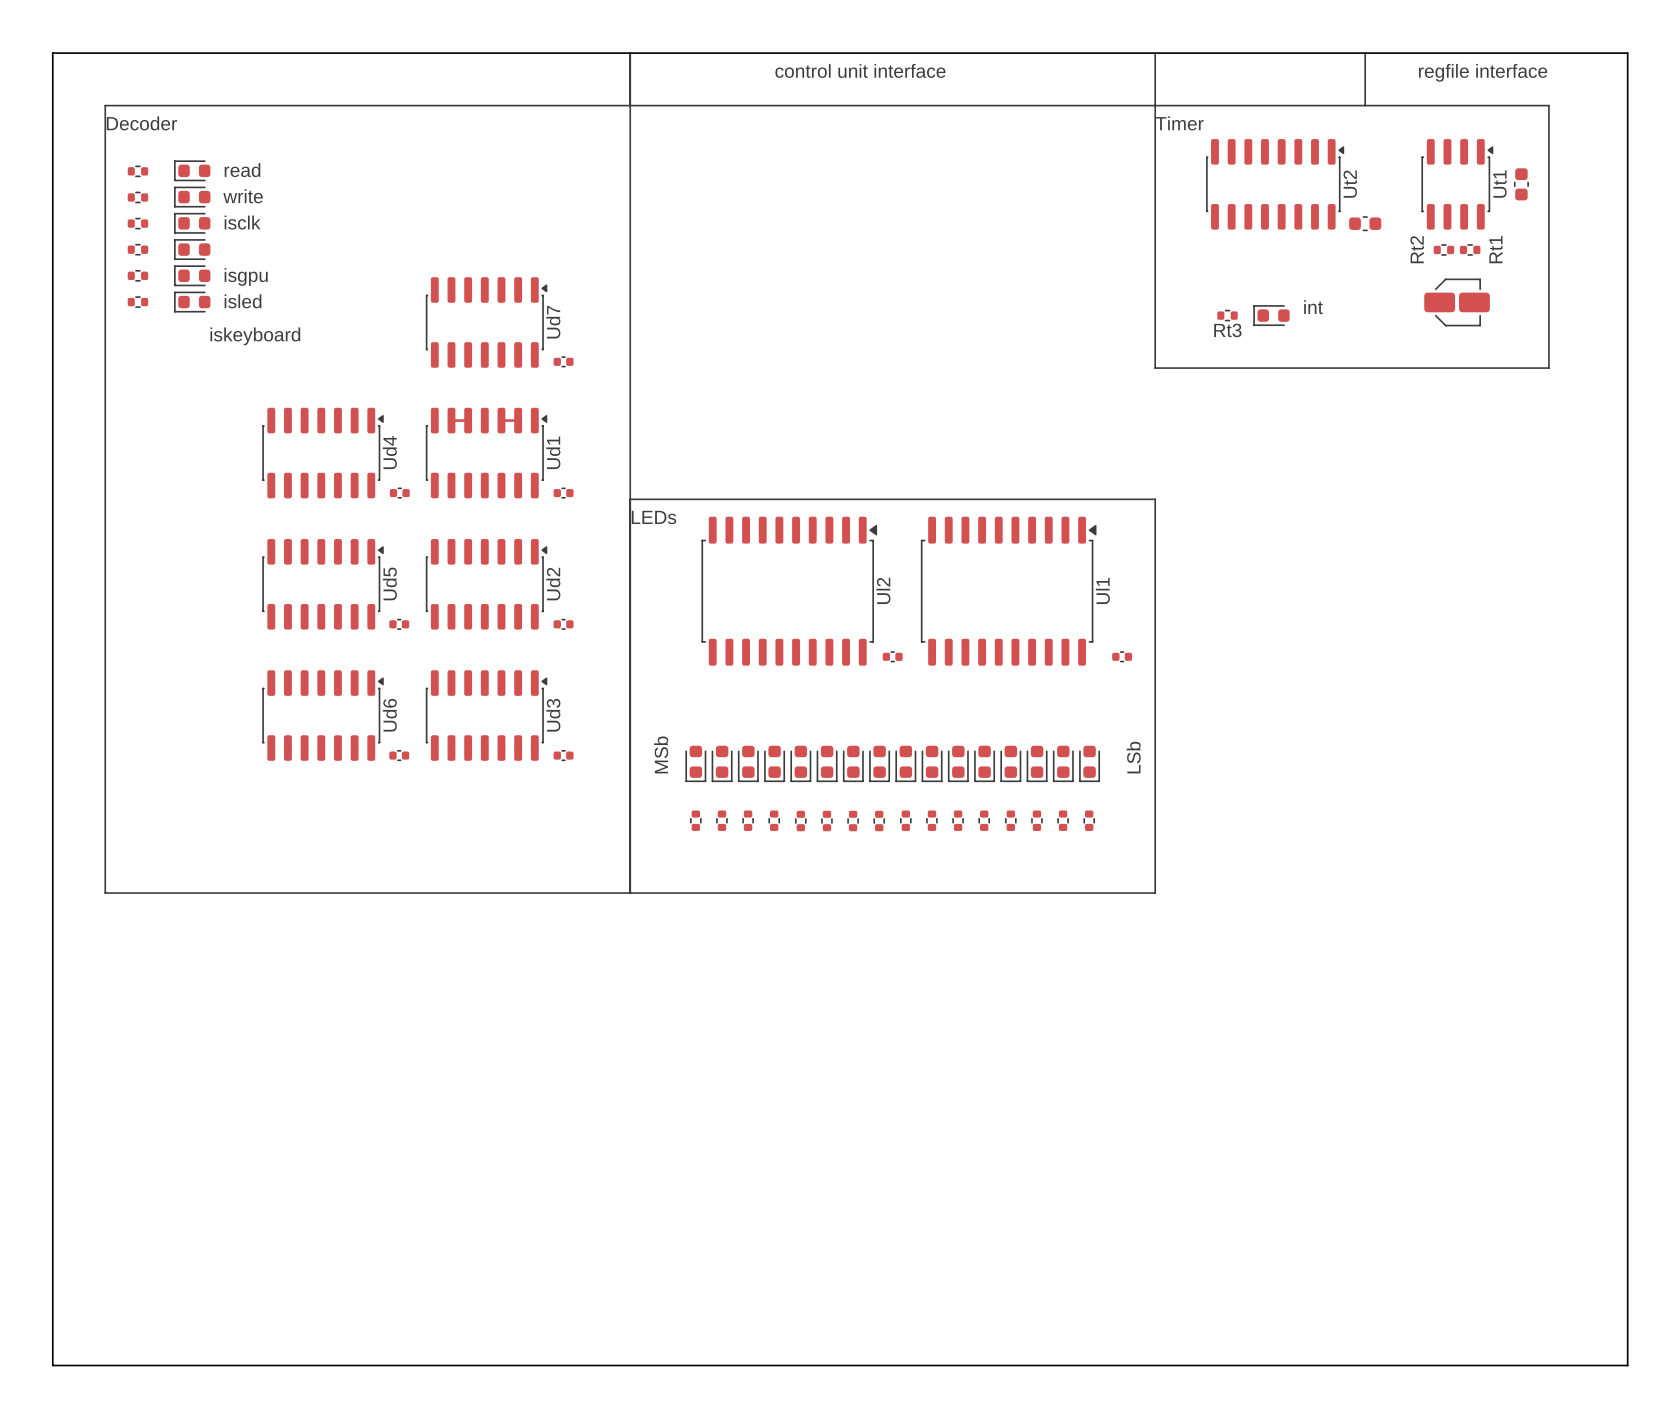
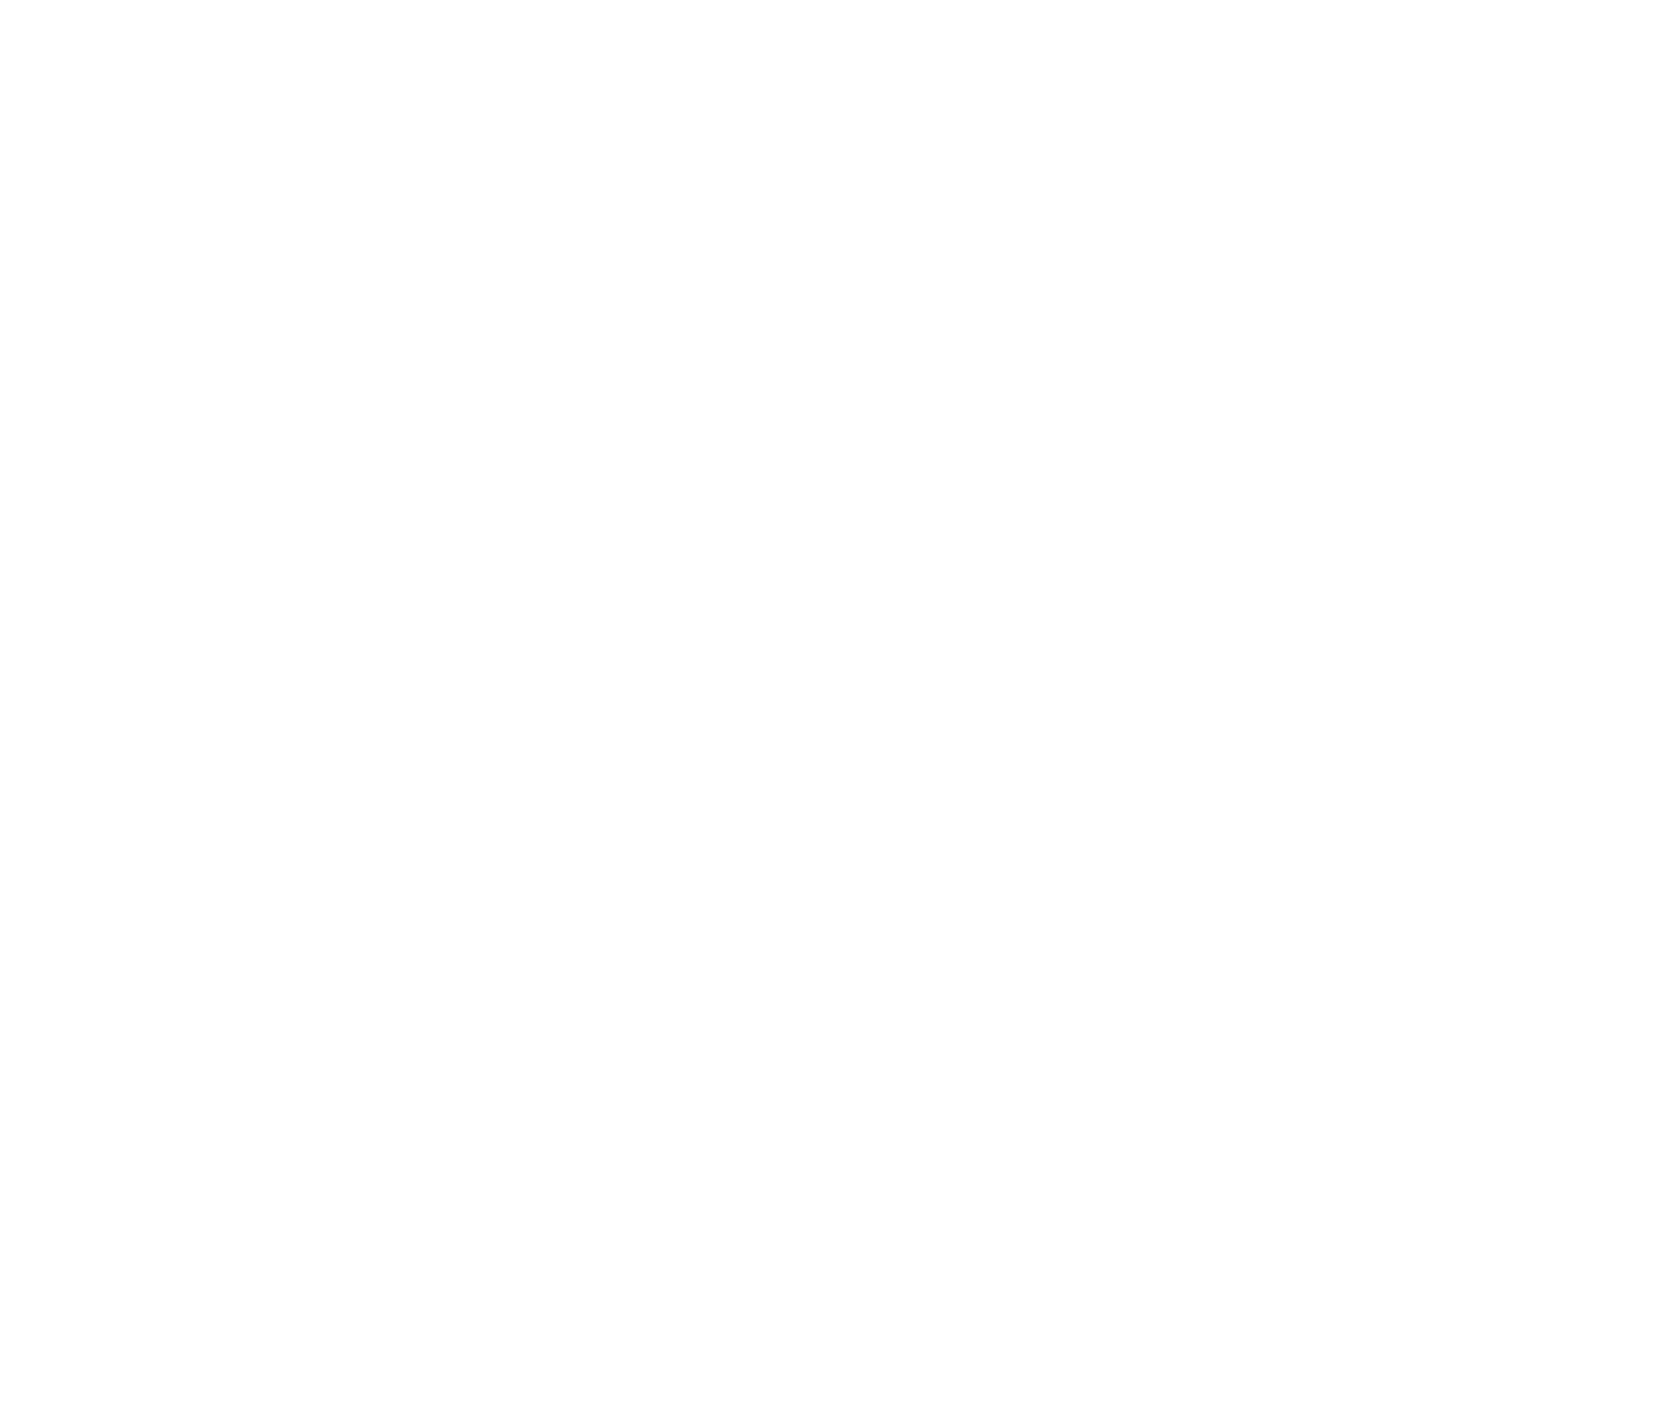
board edge: (52, 53) (1627, 53) (1627, 1365) (52, 1365) (52, 53) -> none
line: (630, 53) (630, 893) -> none
line: (1155, 53) (1155, 368) (1548, 368) (1548, 105) (105, 105) (105, 893) (1155, 893) (1155, 499) (630, 499) -> none
line: (1365, 53) (1365, 105) -> none
text: control unit interface (860, 70) -> none
text: regfile interface (1483, 72) -> none
text: Decoder (141, 123) -> none
text: Timer (1179, 123) -> none
part: (192, 170) -> none
text: read (242, 170) -> none
part: (137, 171) -> none
Ut2: (1275, 184) -> none
Ut1: (1457, 184) -> none
part: (1521, 184) -> none
text: write (243, 196) -> none
part: (137, 197) -> none
part: (192, 197) -> none
text: isclk (242, 222) -> none
part: (137, 223) -> none
part: (192, 223) -> none
part: (1365, 223) -> none
part: (137, 249) -> none
part: (192, 249) -> none
Rt2: (1443, 249) -> none
Rt1: (1470, 249) -> none
part: (137, 275) -> none
part: (192, 275) -> none
text: isgpu (246, 276) -> none
text: isled (243, 301) -> none
part: (137, 302) -> none
part: (192, 302) -> none
part: (1457, 302) -> none
text: int (1313, 307) -> none
Rt3: (1227, 315) -> none
part: (1271, 315) -> none
Ud7: (486, 322) -> none
text: iskeyboard (255, 336) -> none
part: (563, 361) -> none
track: (451, 420) (468, 420) -> none
track: (501, 420) (518, 420) -> none
Ud4: (323, 453) -> none
Ud1: (486, 453) -> none
part: (399, 493) -> none
part: (563, 493) -> none
text: LEDs (653, 517) -> none
Ud5: (323, 584) -> none
Ud2: (486, 584) -> none
Ul2: (789, 591) -> none
Ul1: (1008, 591) -> none
part: (399, 624) -> none
part: (563, 624) -> none
part: (892, 656) -> none
part: (1122, 656) -> none
Ud6: (323, 715) -> none
Ud3: (486, 715) -> none
text: MSb (661, 754) -> none
part: (399, 755) -> none
part: (563, 755) -> none
text: LSb (1133, 757) -> none
part: (695, 763) -> none
part: (722, 763) -> none
part: (748, 763) -> none
part: (774, 763) -> none
part: (800, 763) -> none
part: (827, 763) -> none
part: (853, 763) -> none
part: (879, 763) -> none
part: (905, 763) -> none
part: (932, 763) -> none
part: (958, 763) -> none
part: (984, 763) -> none
part: (1010, 763) -> none
part: (1037, 763) -> none
part: (1063, 763) -> none
part: (1089, 763) -> none
part: (695, 820) -> none
part: (721, 820) -> none
part: (748, 820) -> none
part: (774, 820) -> none
part: (800, 820) -> none
part: (826, 820) -> none
part: (853, 820) -> none
part: (879, 820) -> none
part: (905, 820) -> none
part: (931, 820) -> none
part: (958, 820) -> none
part: (984, 820) -> none
part: (1010, 820) -> none
part: (1036, 820) -> none
part: (1063, 820) -> none
part: (1089, 820) -> none

